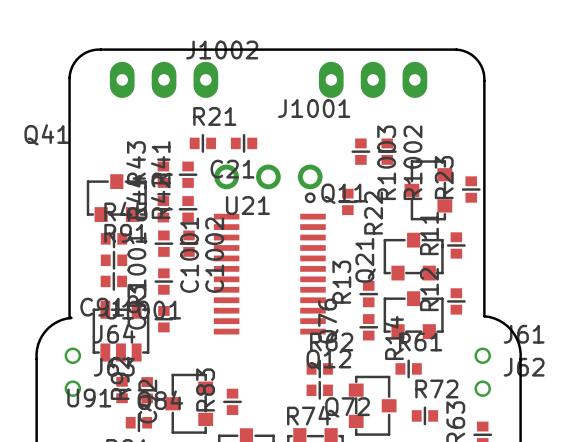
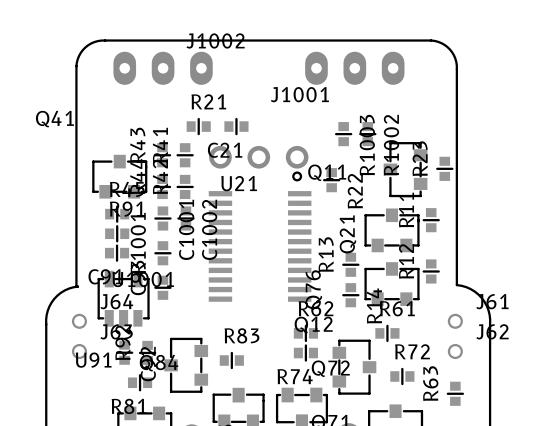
R83 rotation: 0° (232, 401) -> 90° clockwise (231, 360)

